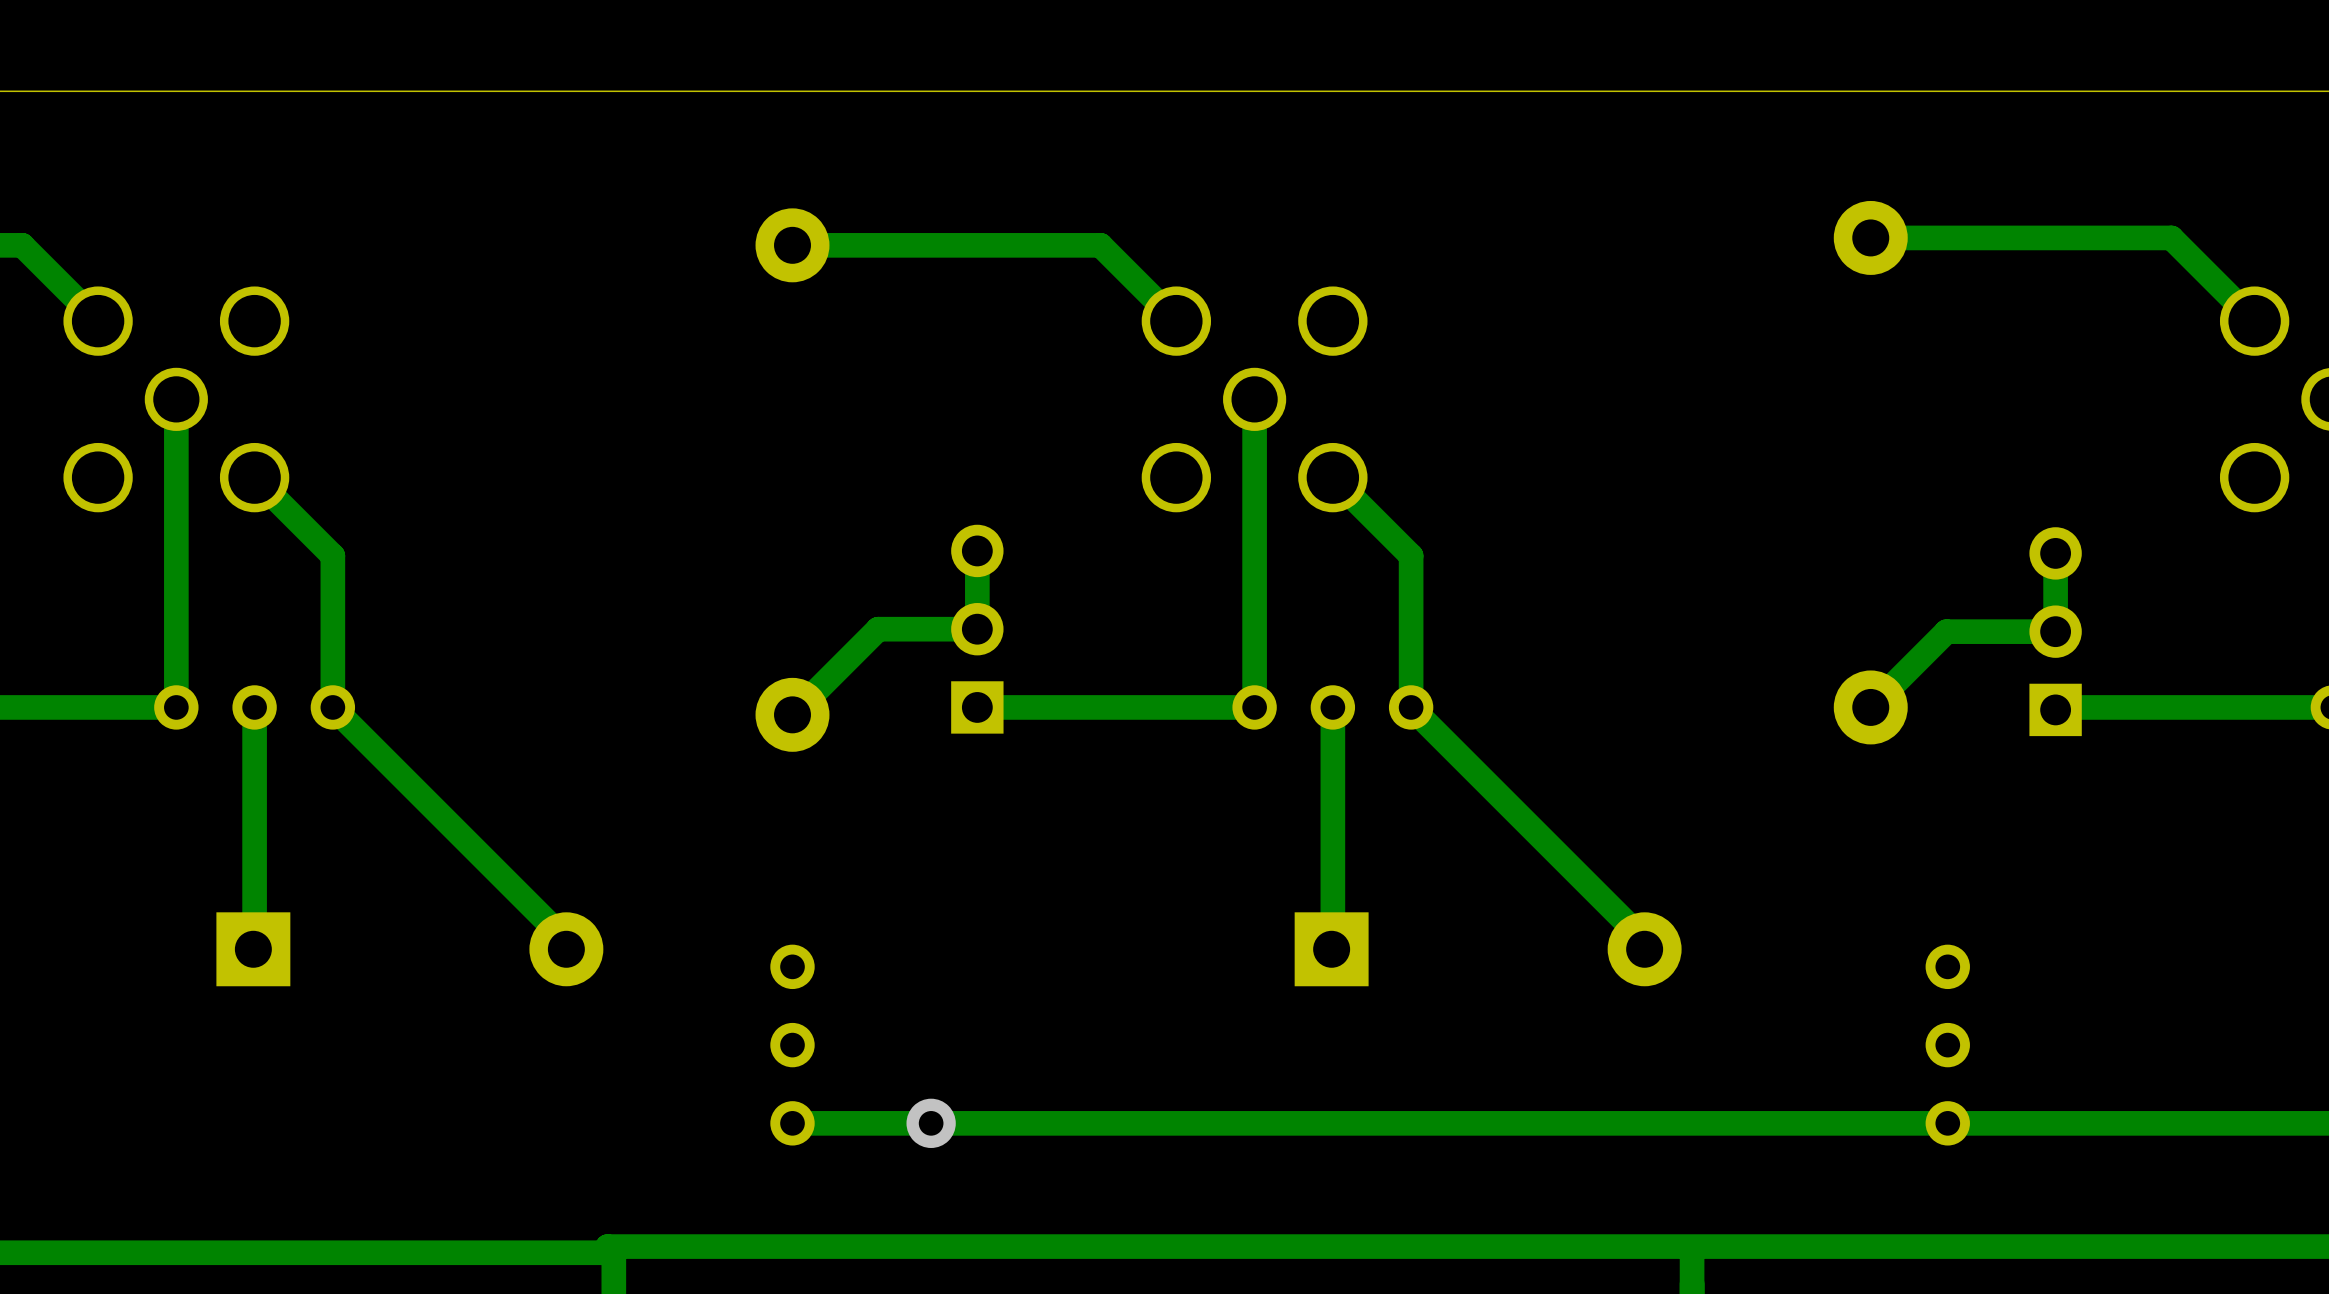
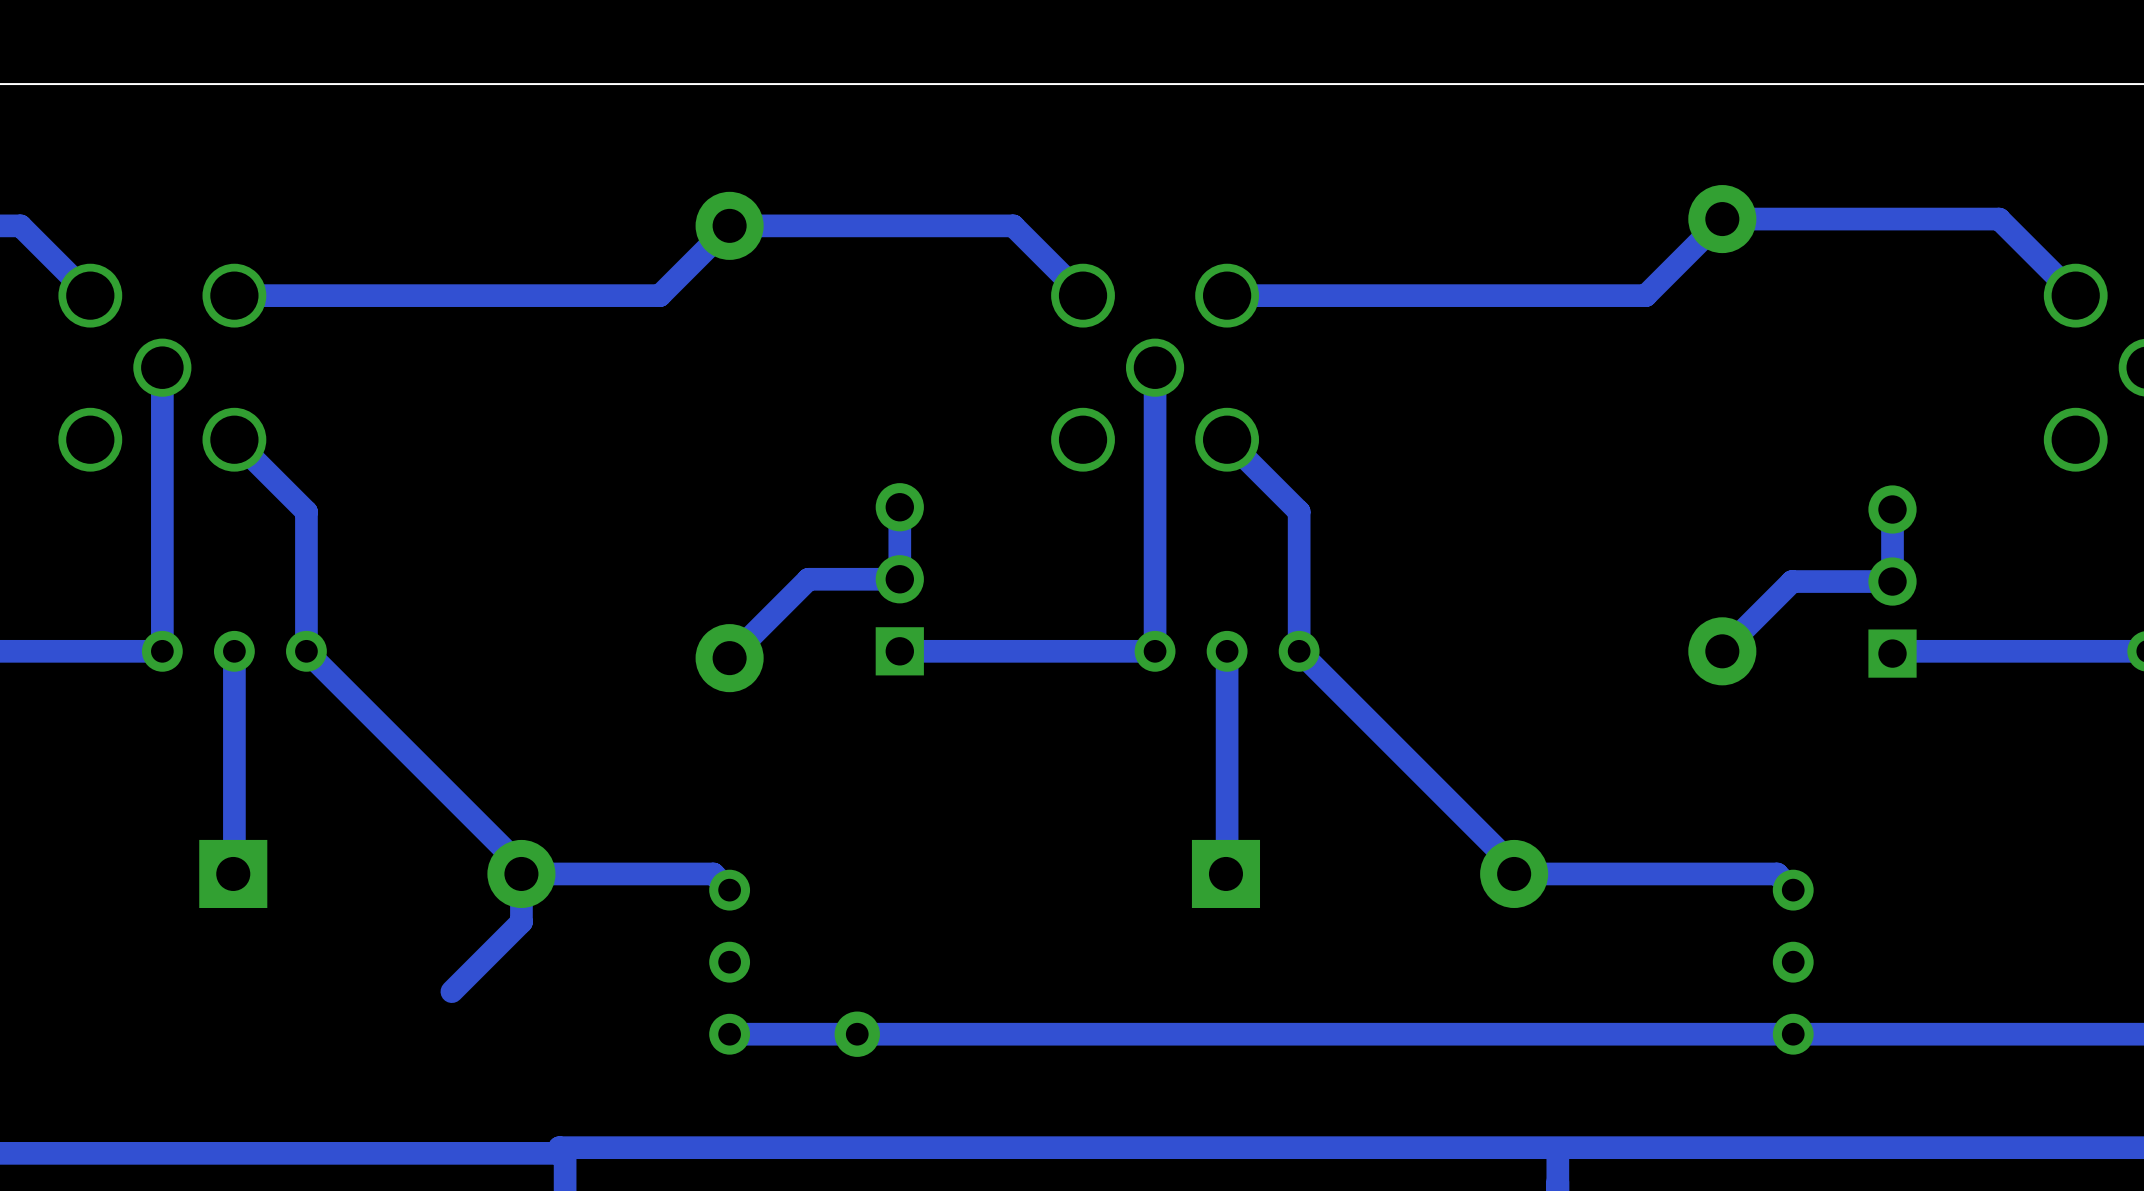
track: none -> (1722, 219) (1645, 295) (1227, 295)
track: none -> (729, 225) (659, 295) (234, 295)
track: none -> (1514, 873) (1777, 873) (1793, 890)
track: none -> (729, 890) (713, 873) (521, 873) (521, 922) (451, 991)

